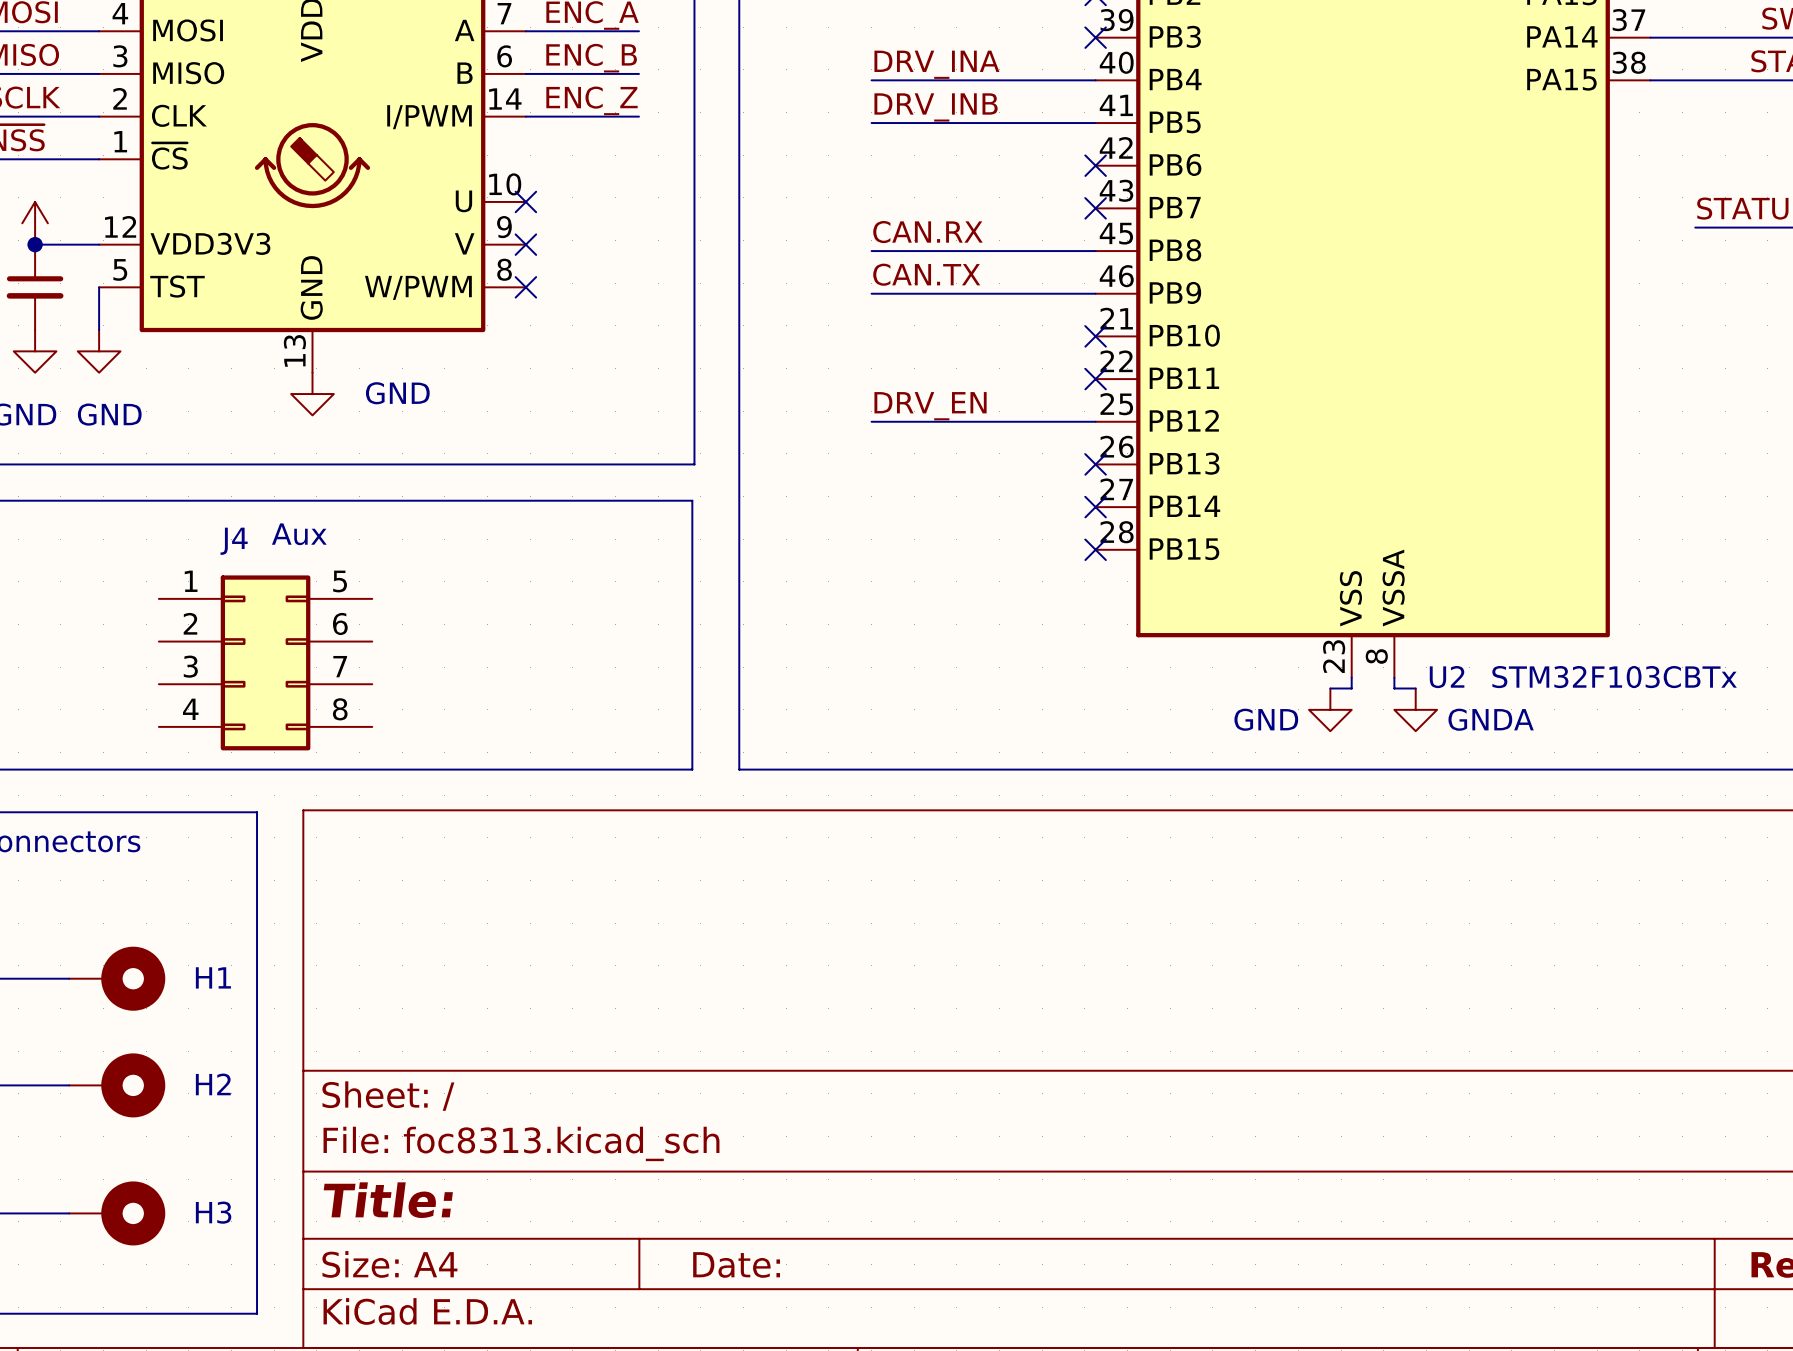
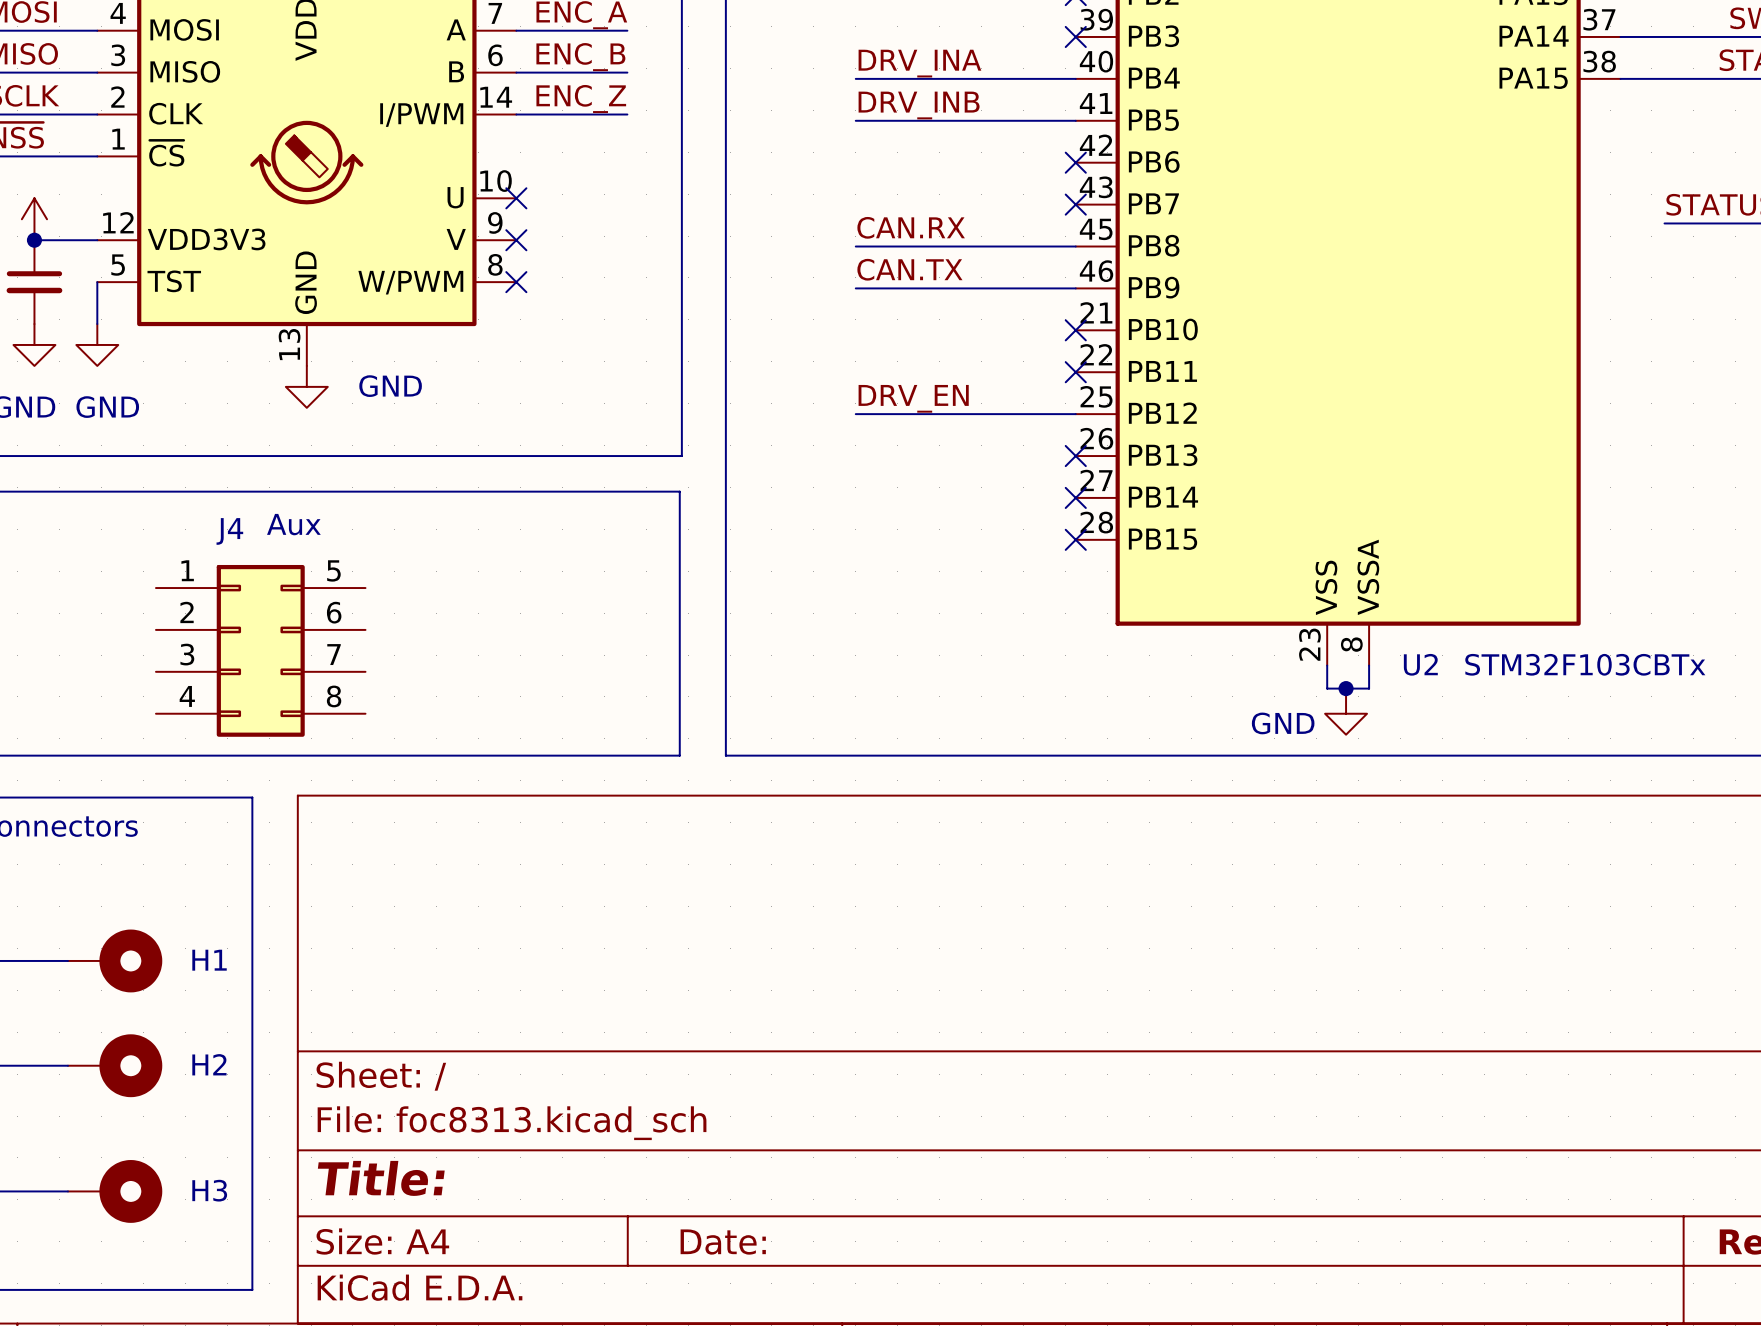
wire: (1330, 688) (1351, 688) -> (1369, 676) (1369, 688) (1327, 688) (1327, 676)
wire: (1394, 688) (1415, 688) -> none
junction: none -> (1346, 688)
power symbol position: GND (1330, 709) -> GND (1346, 713)
power symbol: GNDA (1415, 709) -> none

